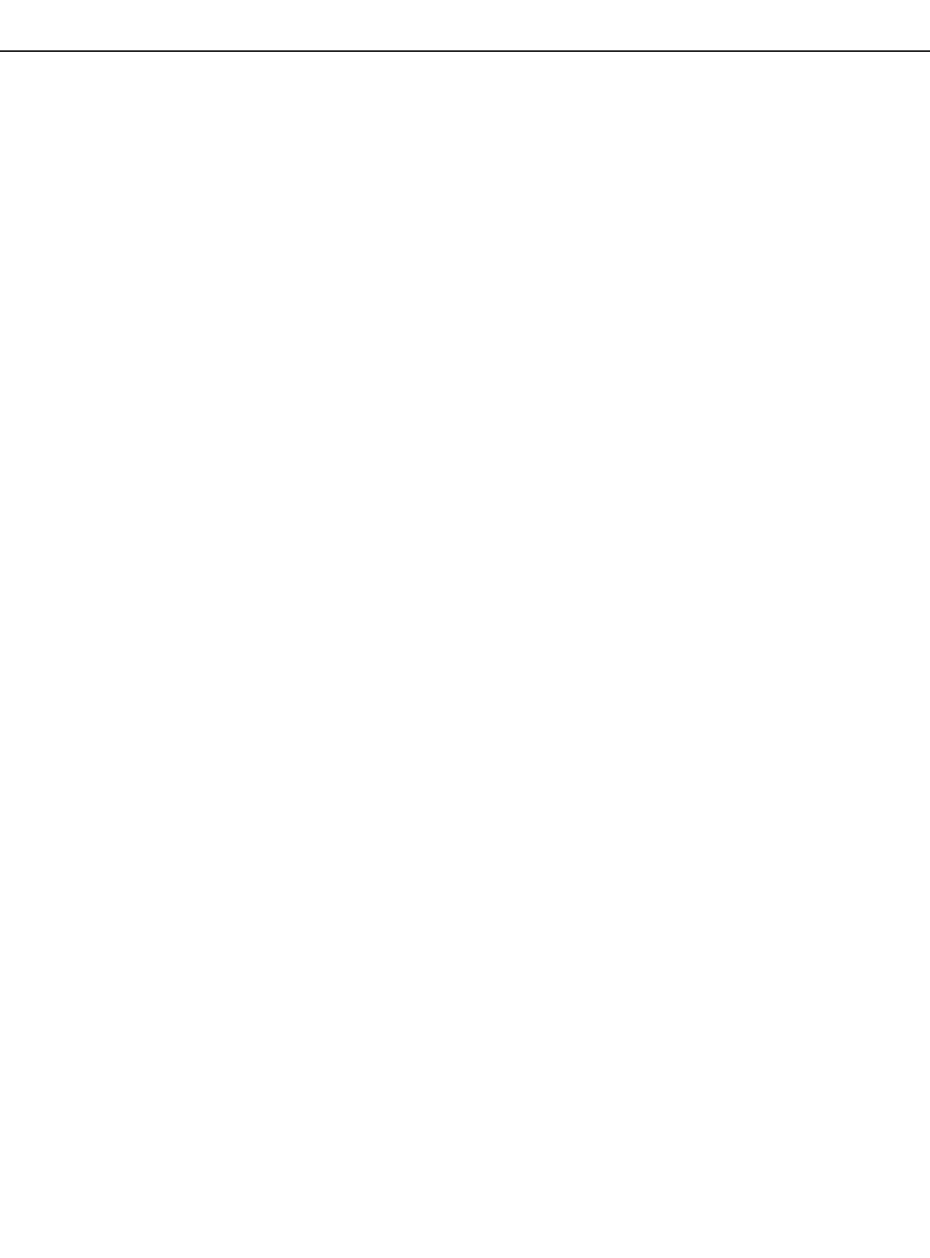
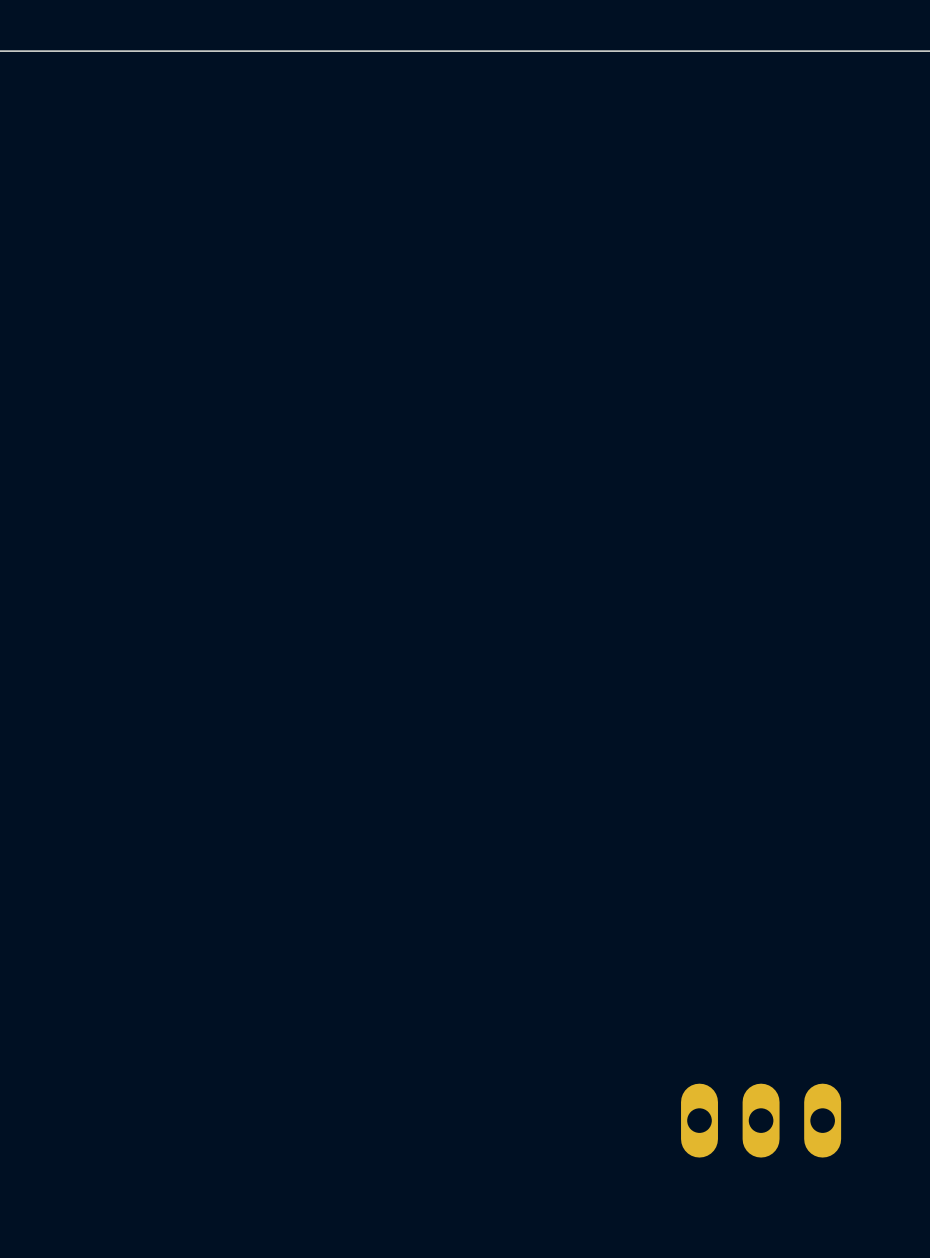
part: none -> (761, 1120)

